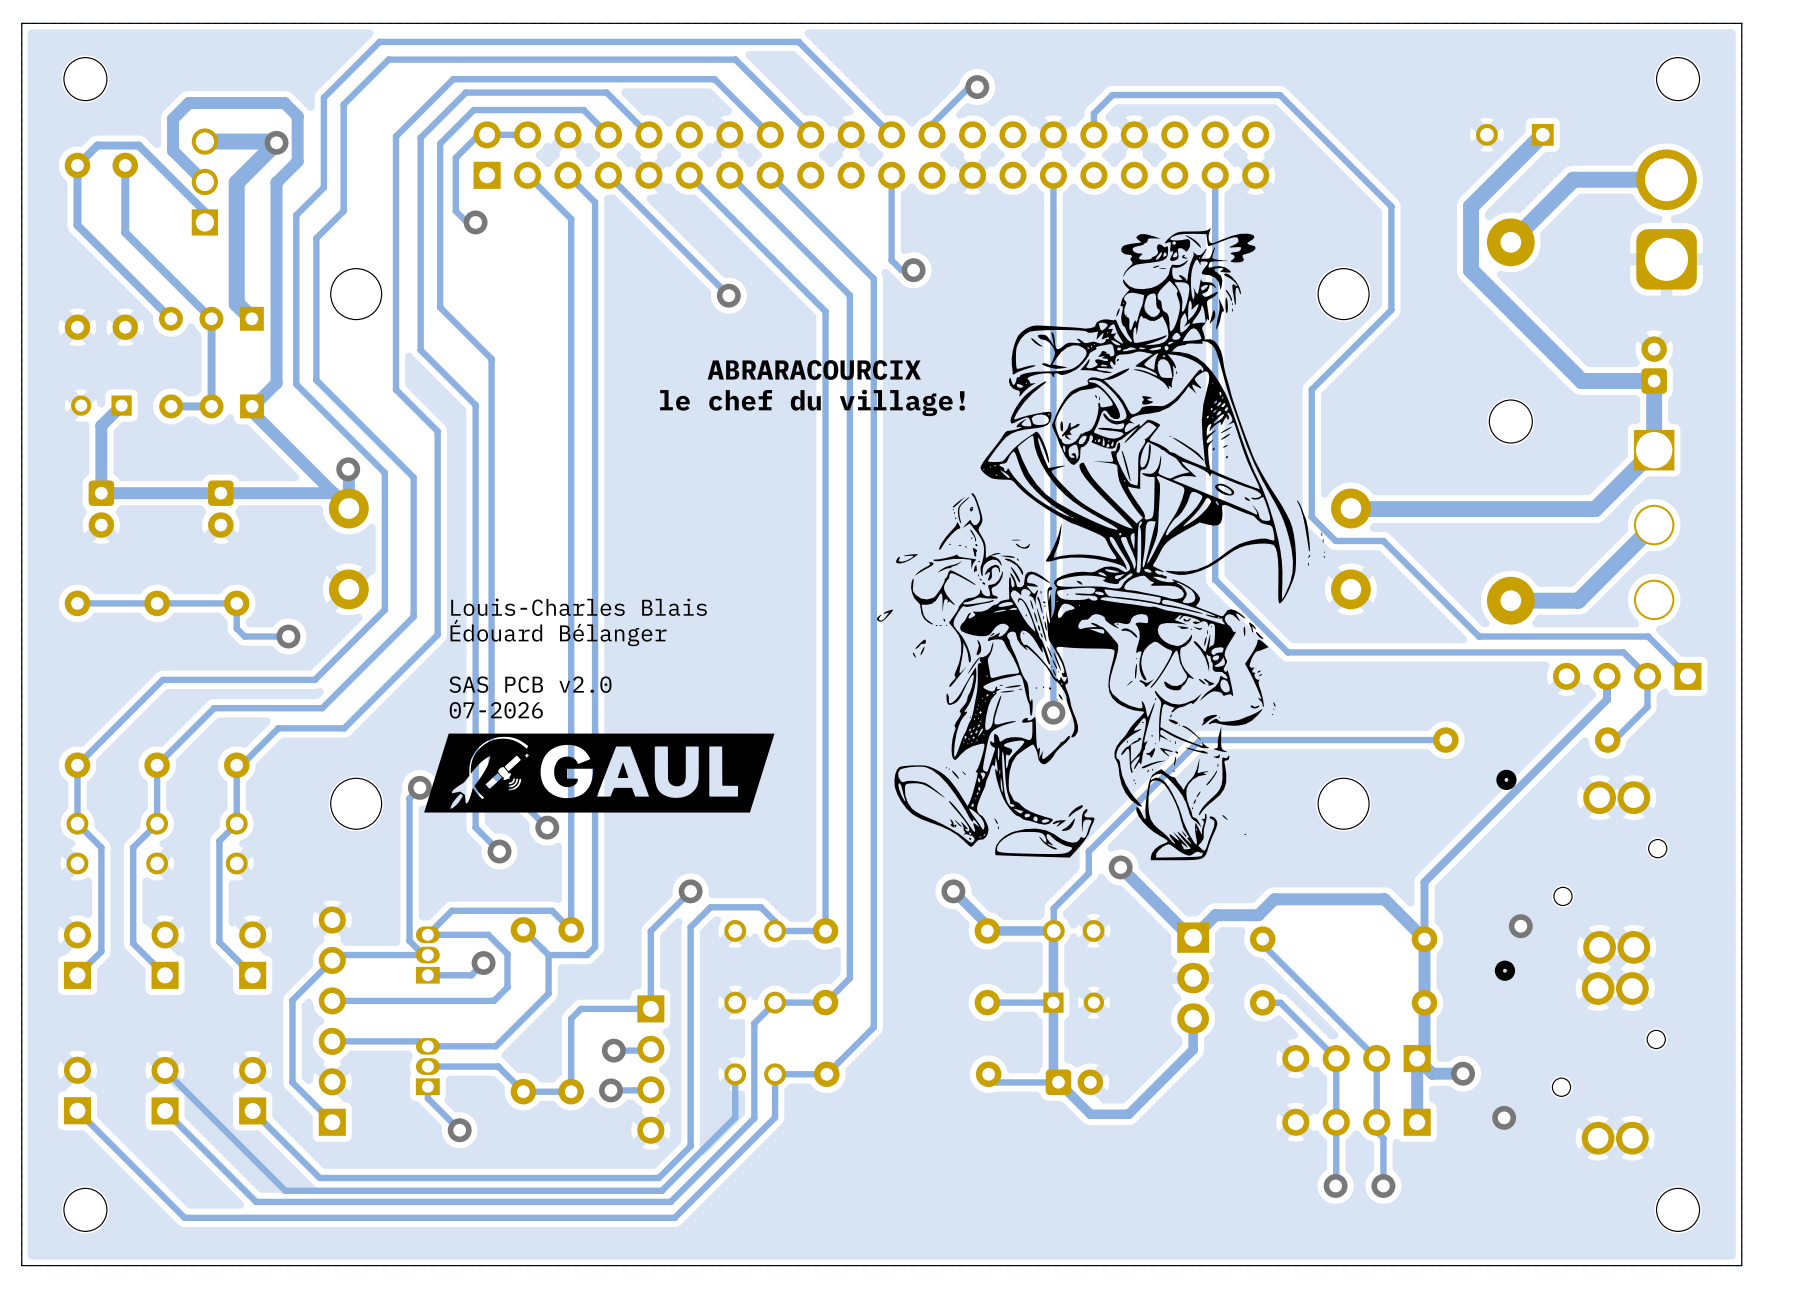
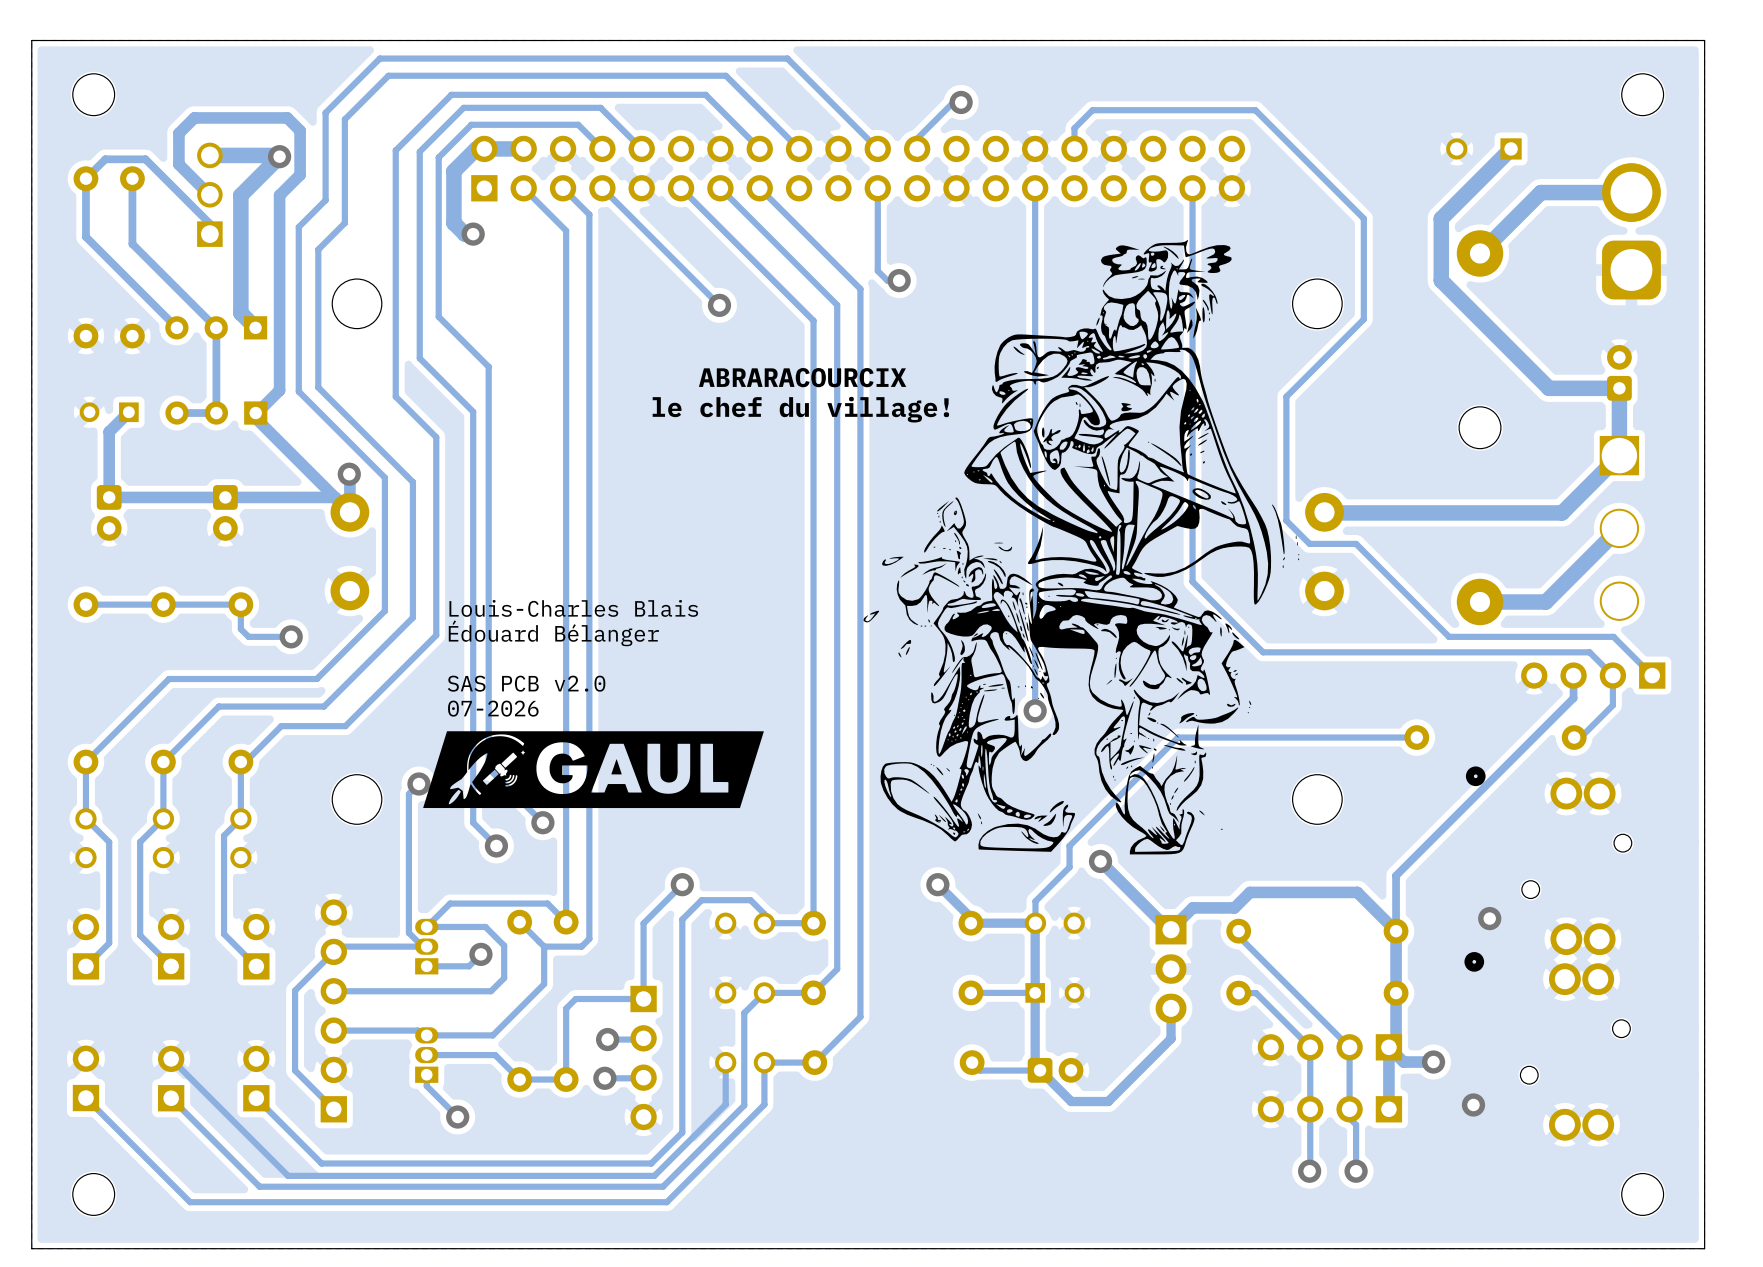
track width: thin (527, 134) (478, 134) (455, 157) (455, 211) (467, 222) (475, 222) -> thick (523, 148) (476, 148) (453, 171) (453, 223) (464, 234) (473, 234)

